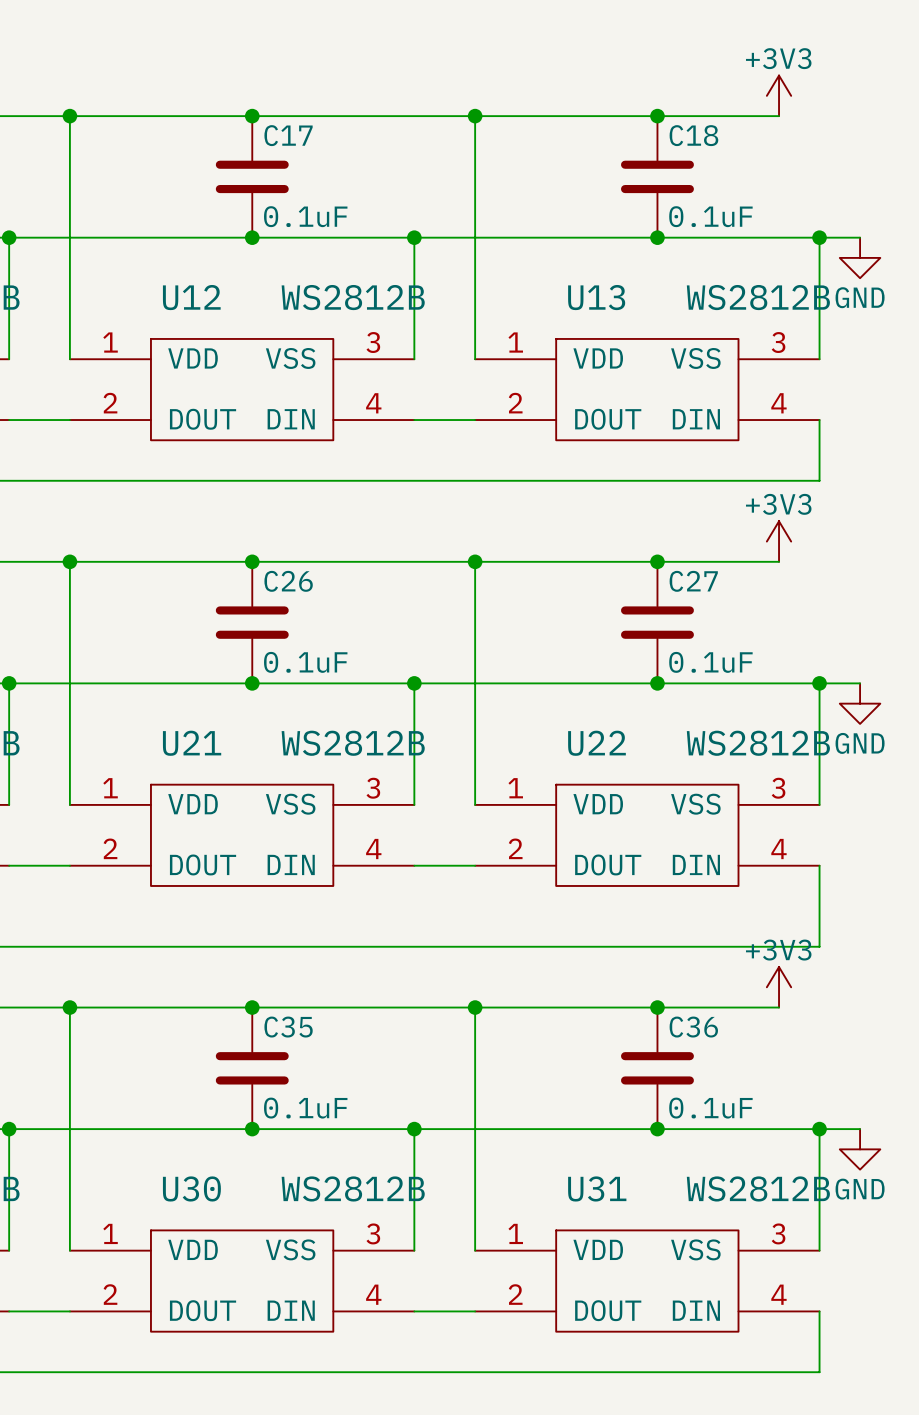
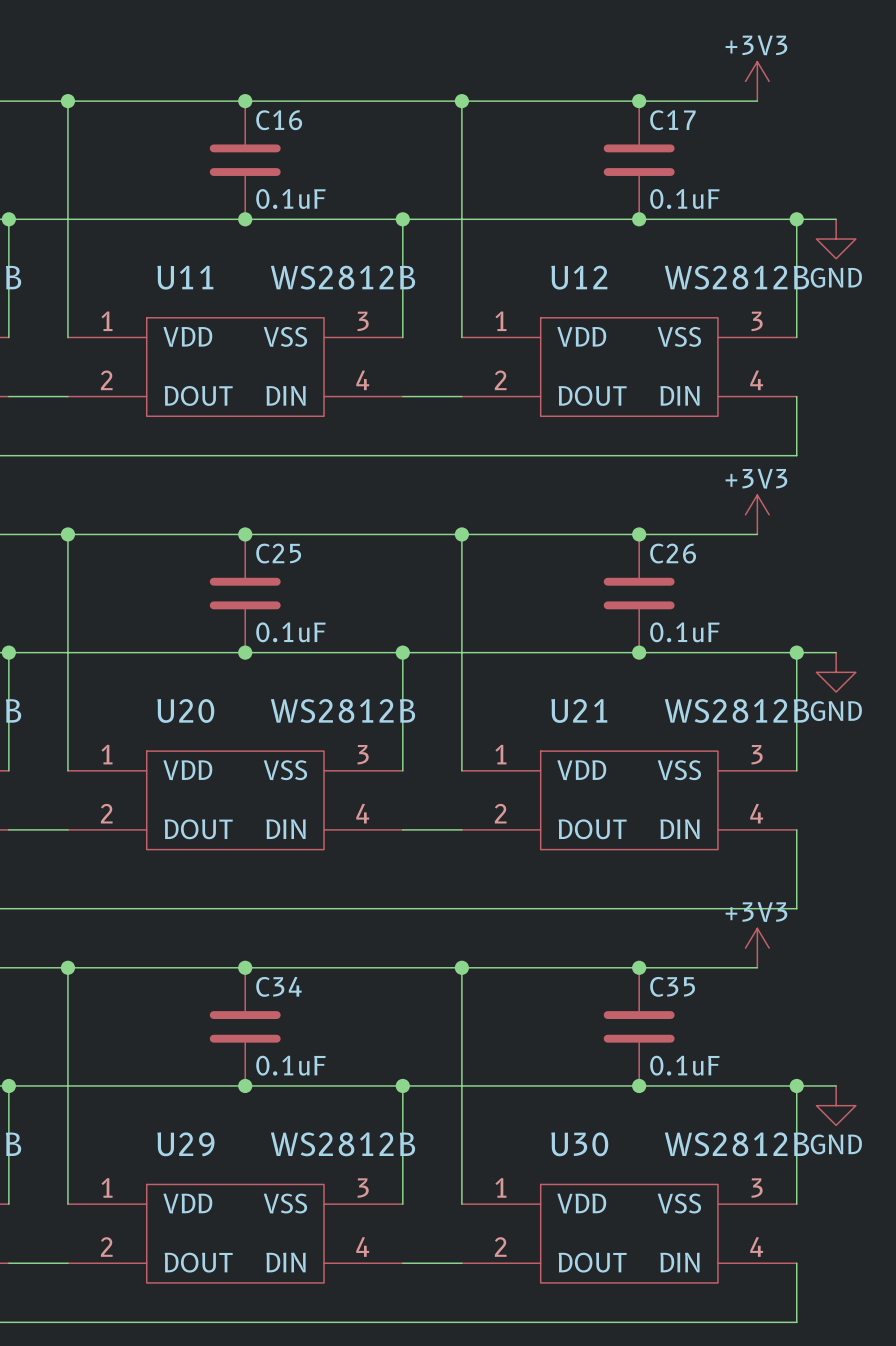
C17 name: C17 (288, 135) -> C16 (279, 120)
C18 name: C18 (693, 135) -> C17 (672, 120)
U12 name: U12 (191, 297) -> U11 (185, 277)
U13 name: U13 (596, 297) -> U12 (579, 277)
C26 name: C26 (288, 581) -> C25 (278, 553)
C27 name: C27 (693, 581) -> C26 (673, 553)
U21 name: U21 (192, 743) -> U20 (185, 710)
U22 name: U22 (596, 743) -> U21 (579, 710)
C35 name: C35 (288, 1027) -> C34 (278, 986)
C36 name: C36 (693, 1027) -> C35 (672, 986)
U30 name: U30 (191, 1188) -> U29 (185, 1144)
U31 name: U31 (597, 1188) -> U30 (579, 1144)

